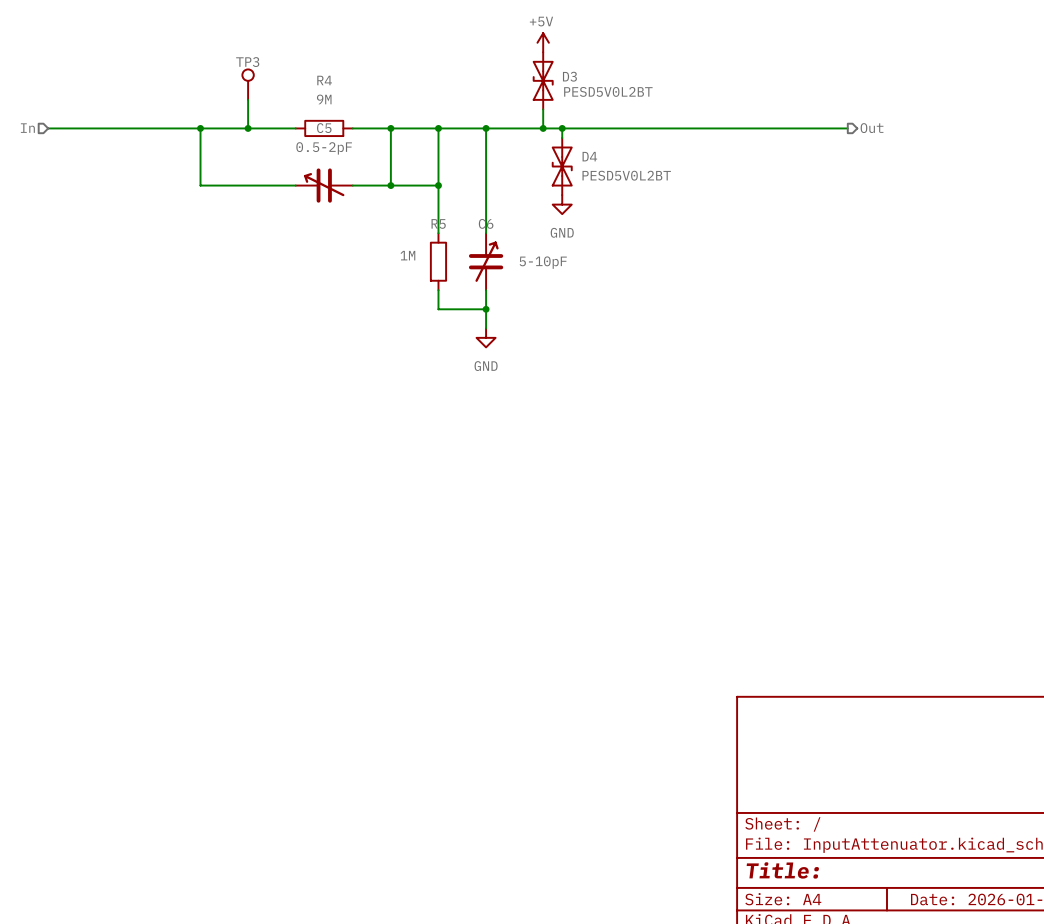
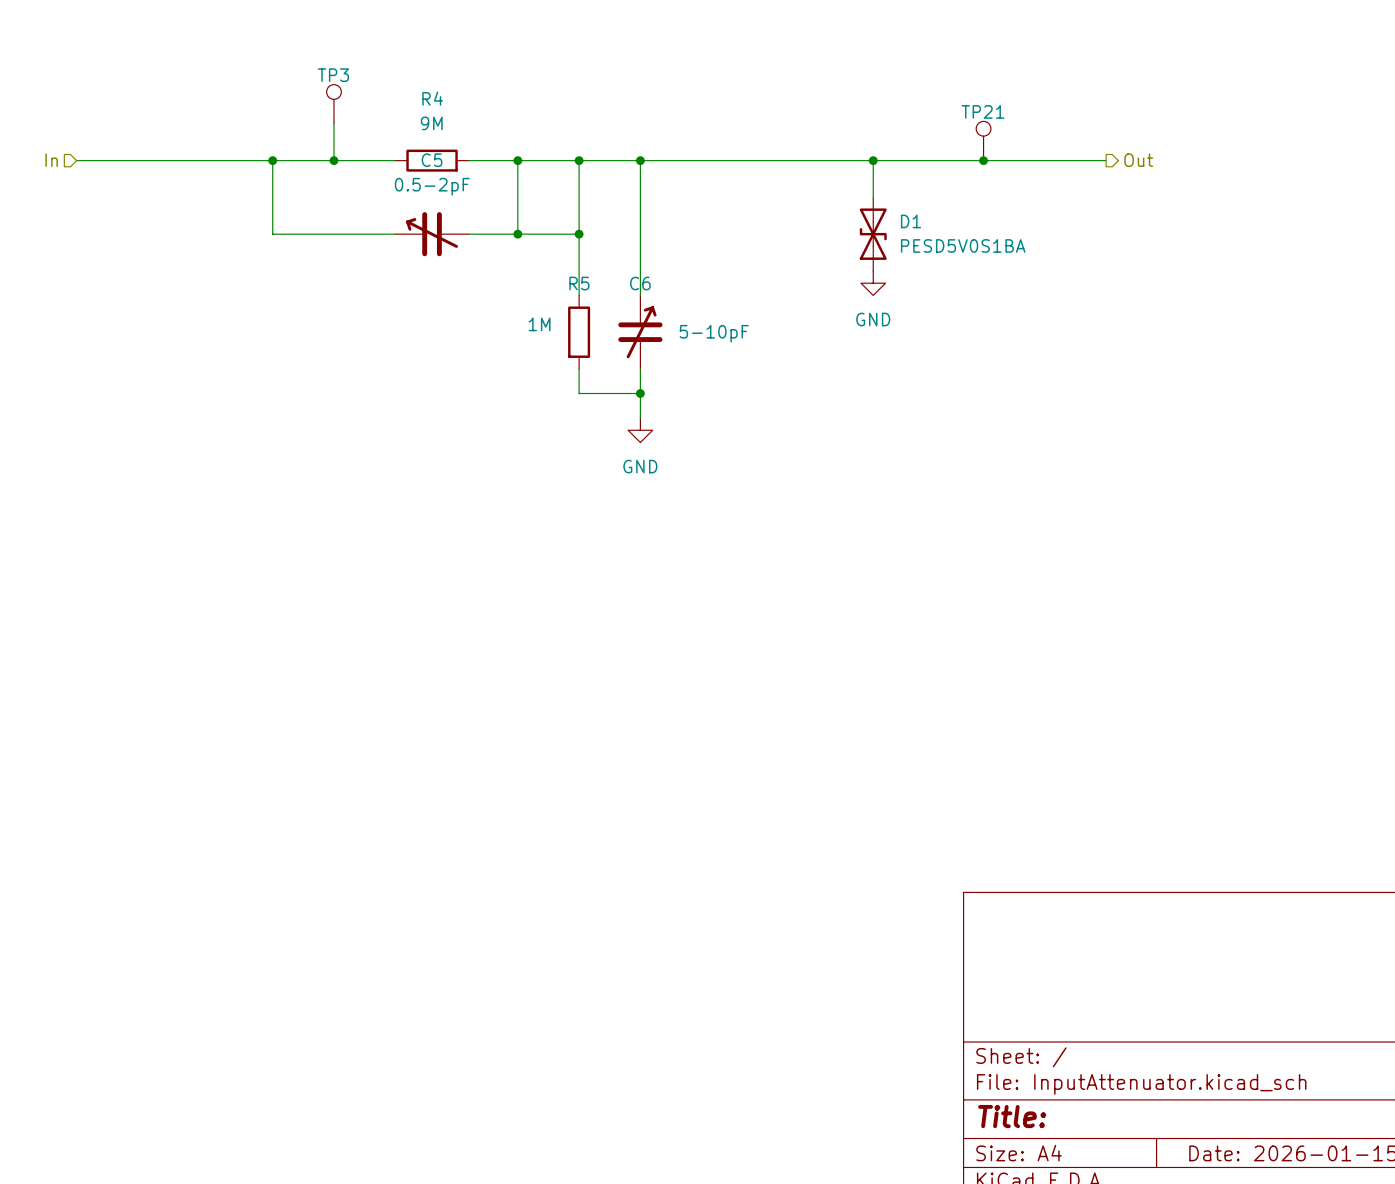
power symbol: +5V (543, 42) -> none
D3: PESD5V0L2BT (543, 80) -> none
wire: (543, 109) (543, 128) -> none
TP21: none -> (983, 141)
junction: (543, 128) -> none
wire: (562, 128) (562, 137) -> none
junction: (562, 128) -> none
wire: none -> (873, 160) (873, 197)
junction: none -> (873, 160)
junction: none -> (983, 160)
D4: PESD5V0L2BT (562, 166) -> none
D1: none -> PESD5V0S1BA (873, 234)
power symbol position: GND (562, 204) -> GND (873, 283)

